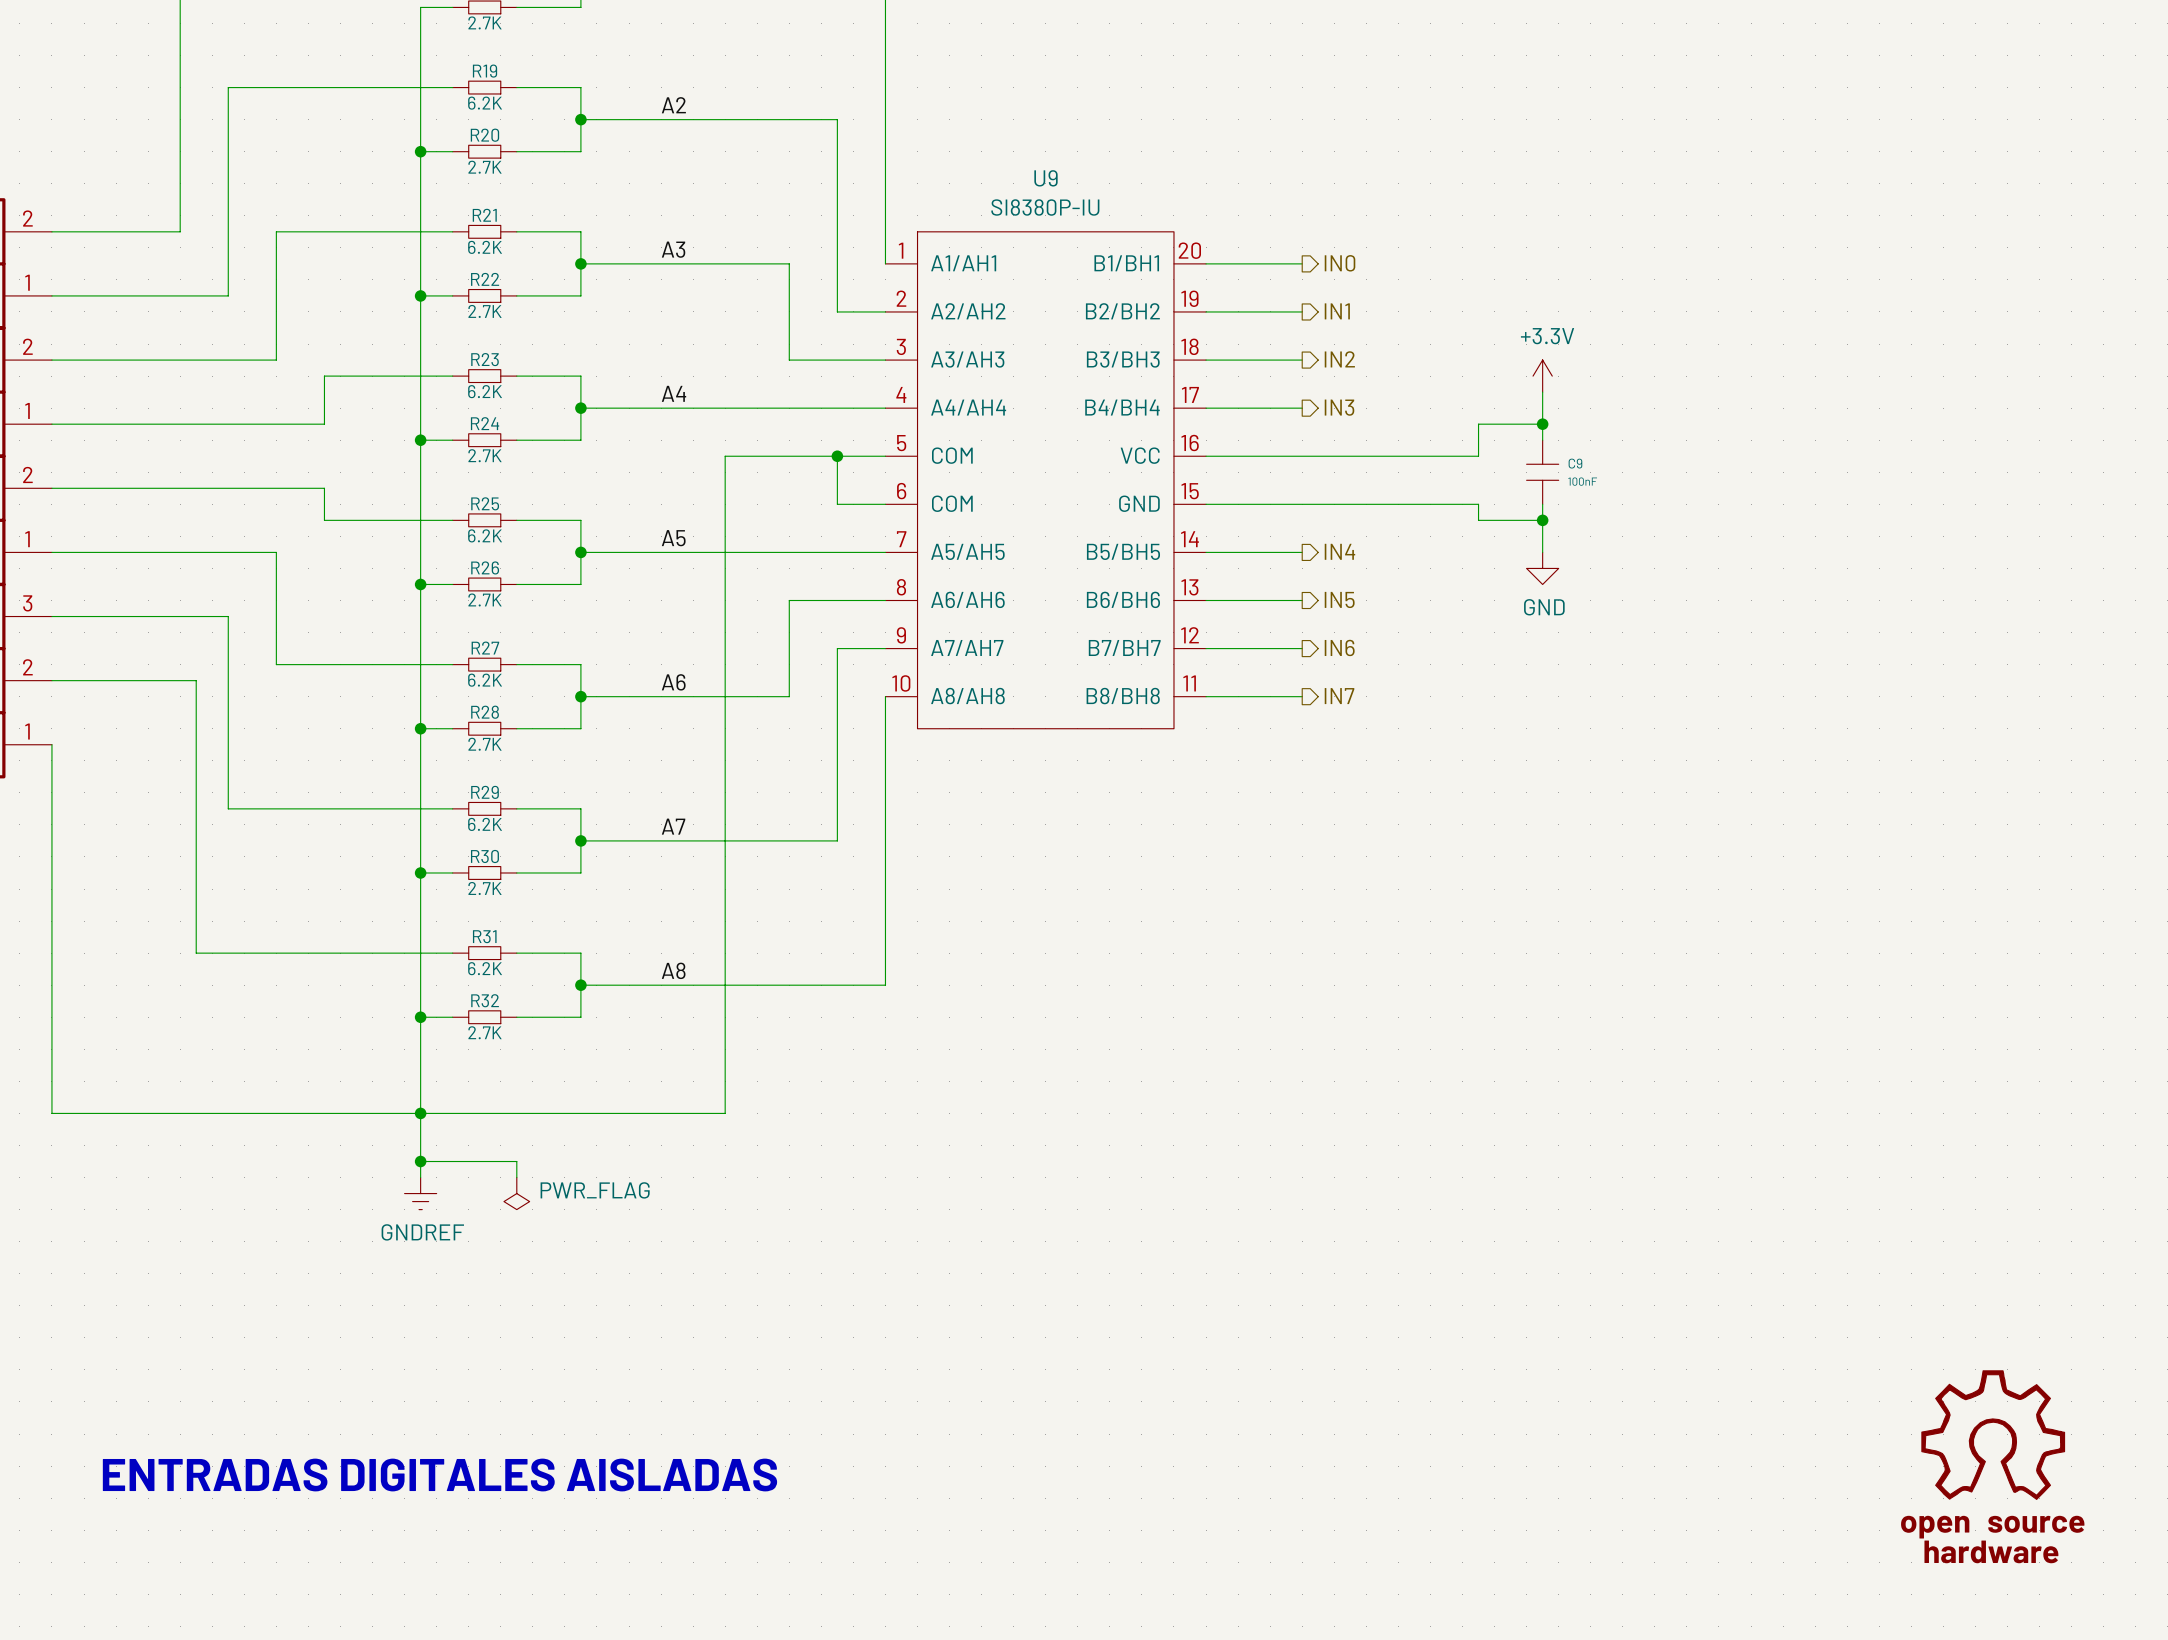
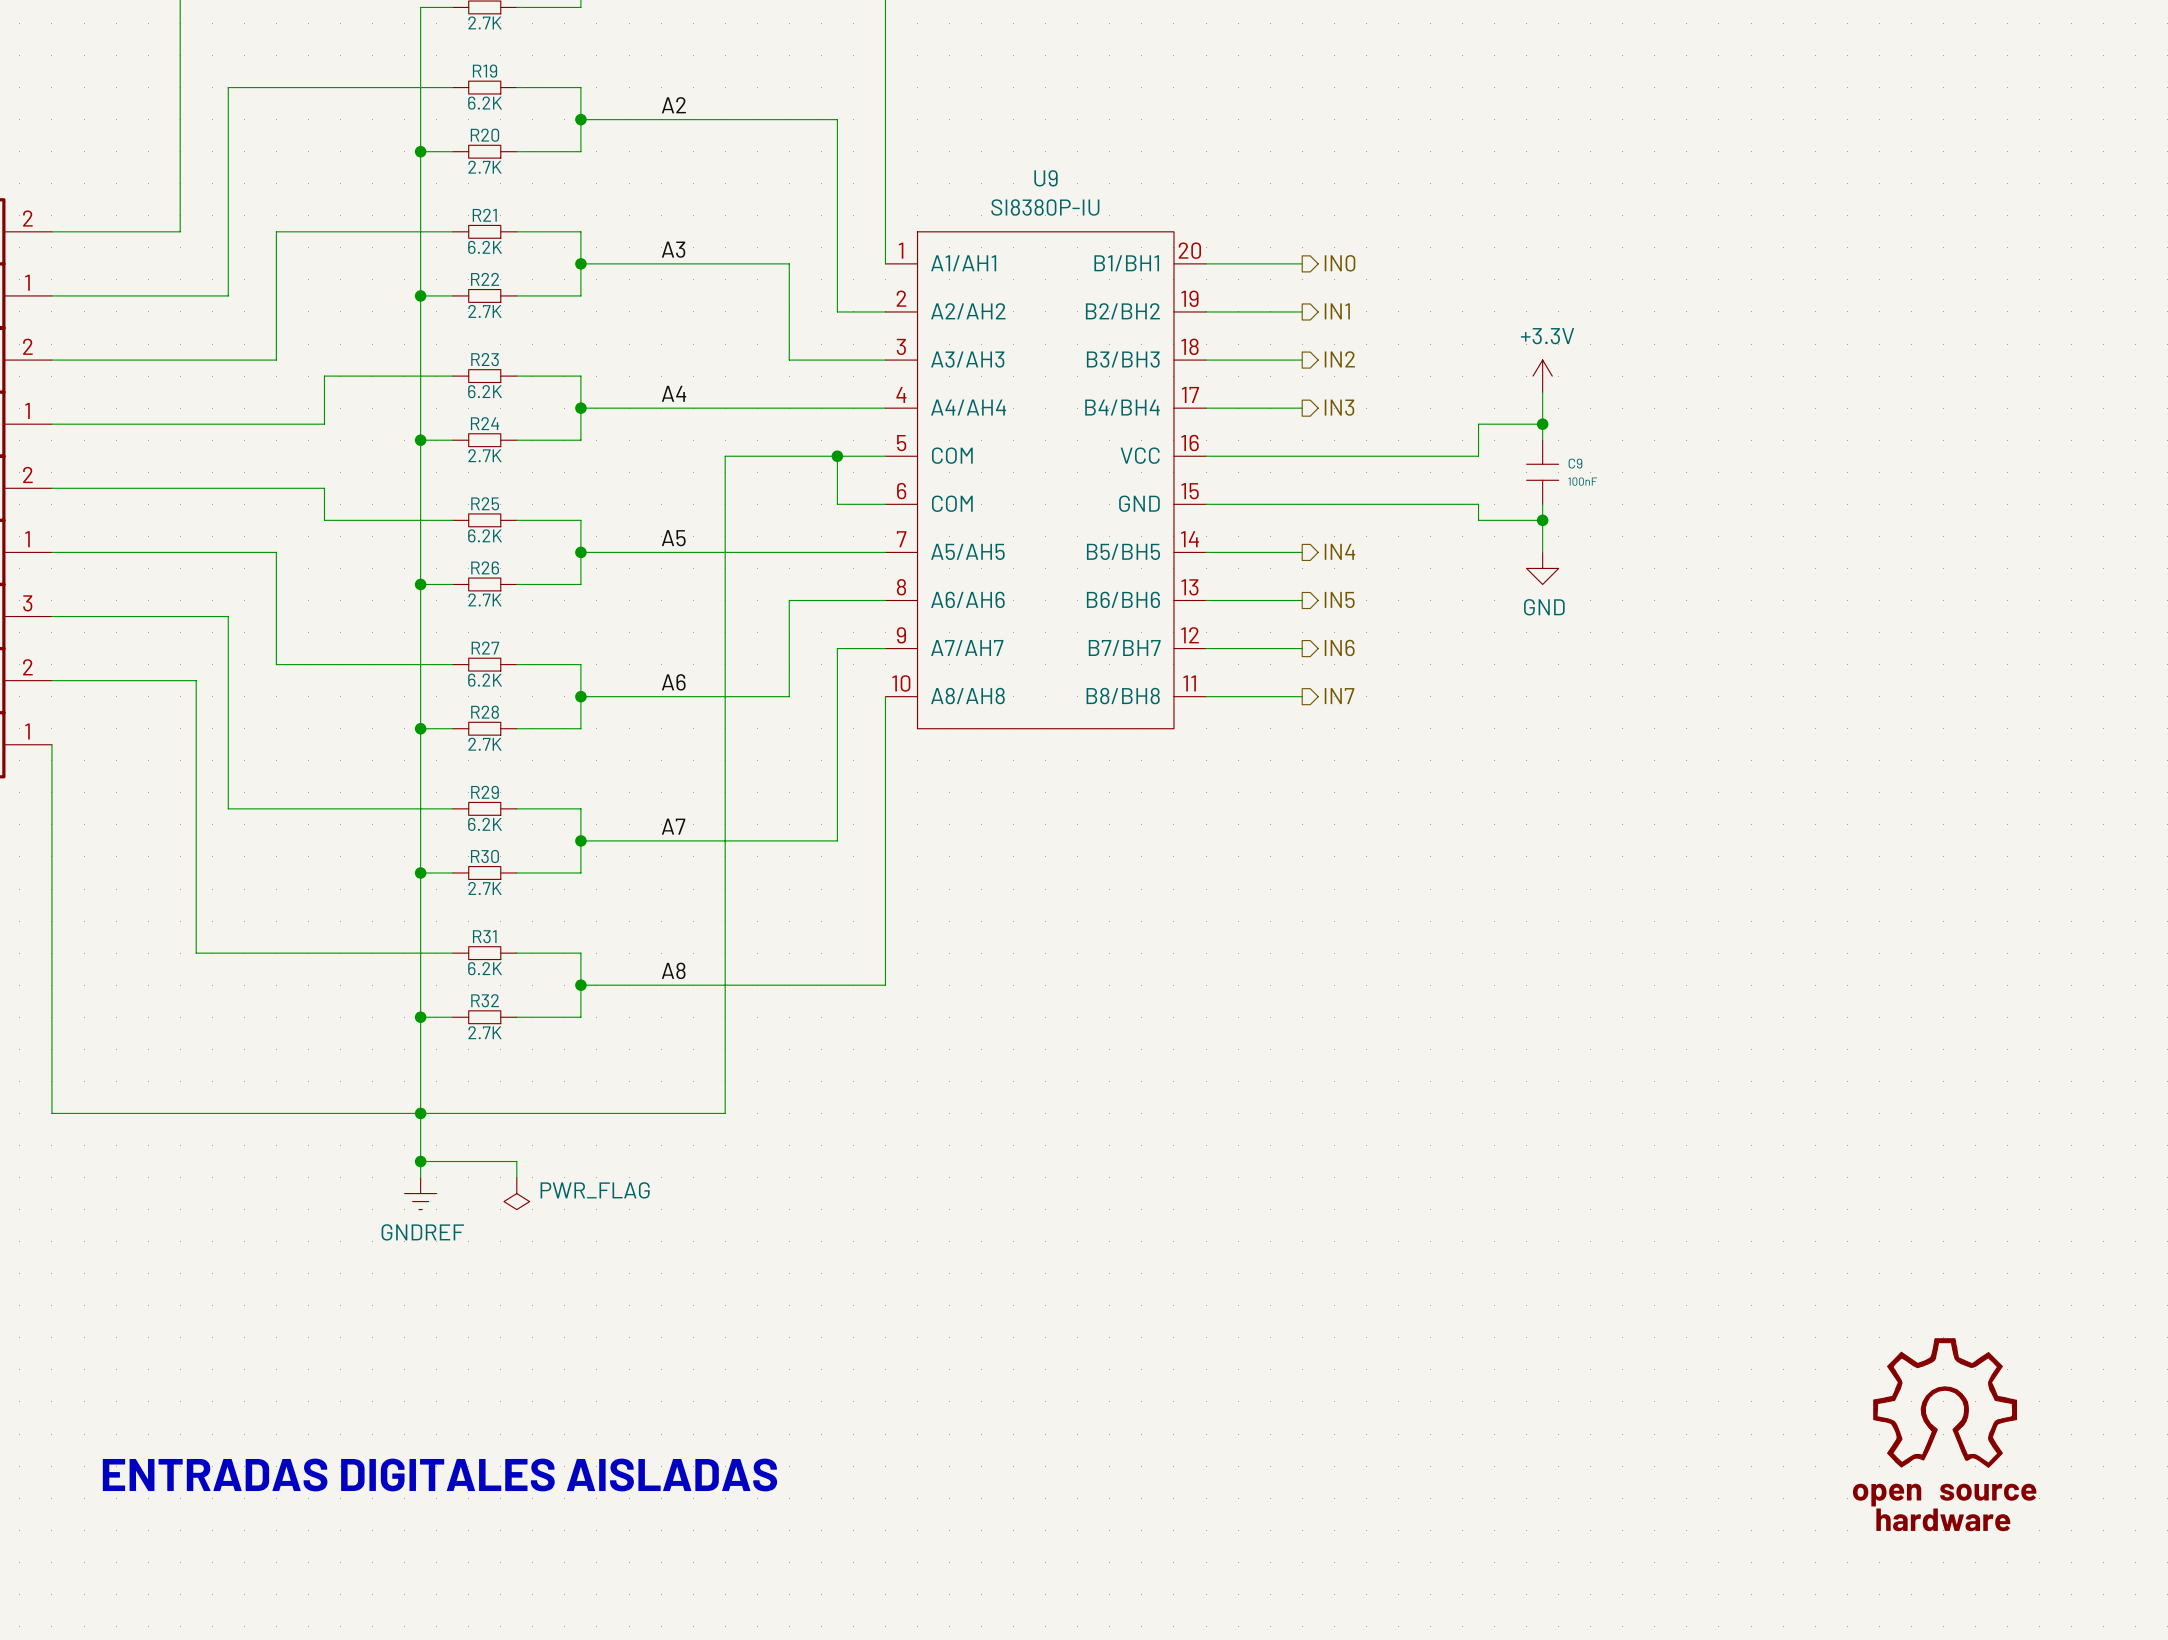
power symbol position: (1993, 1435) -> (1945, 1403)

